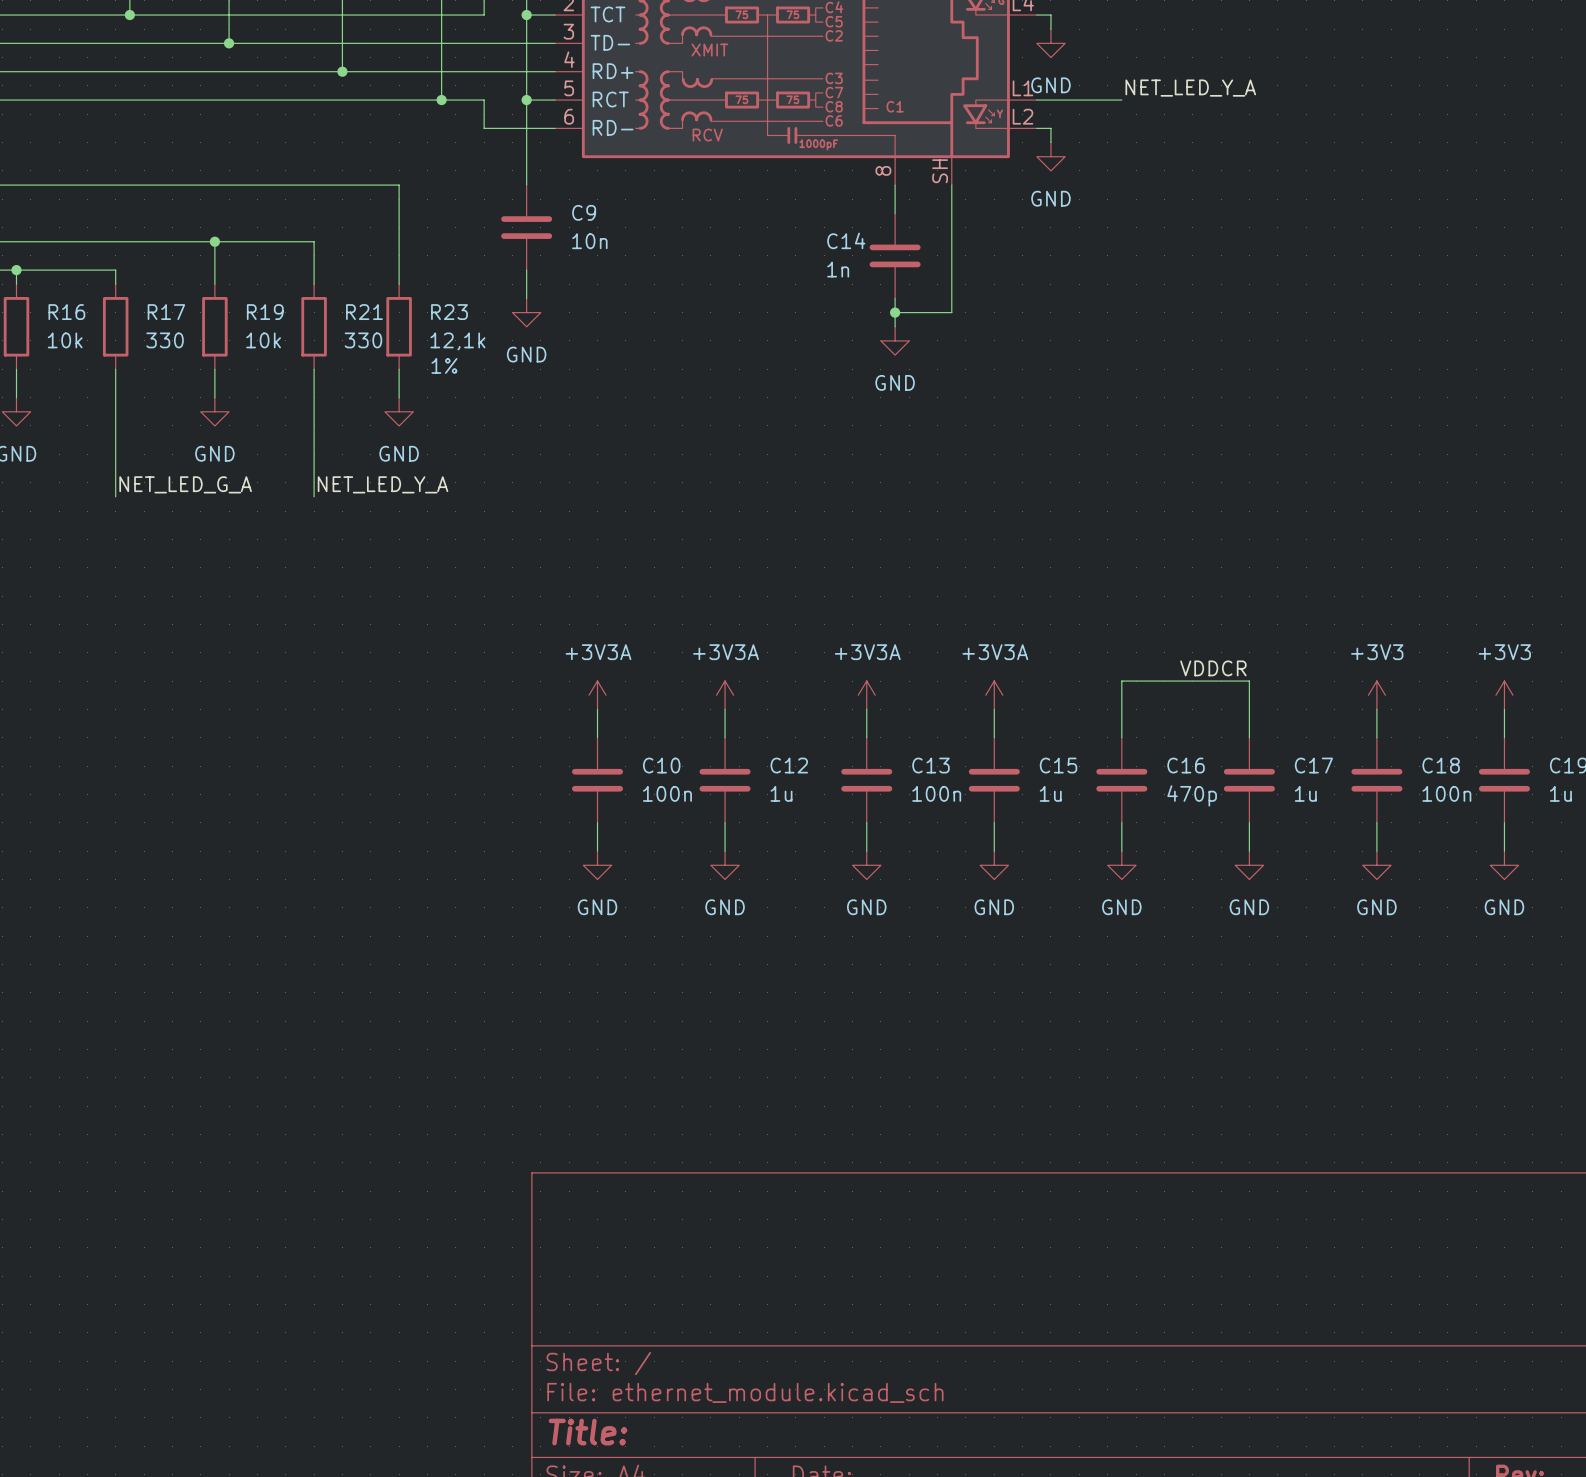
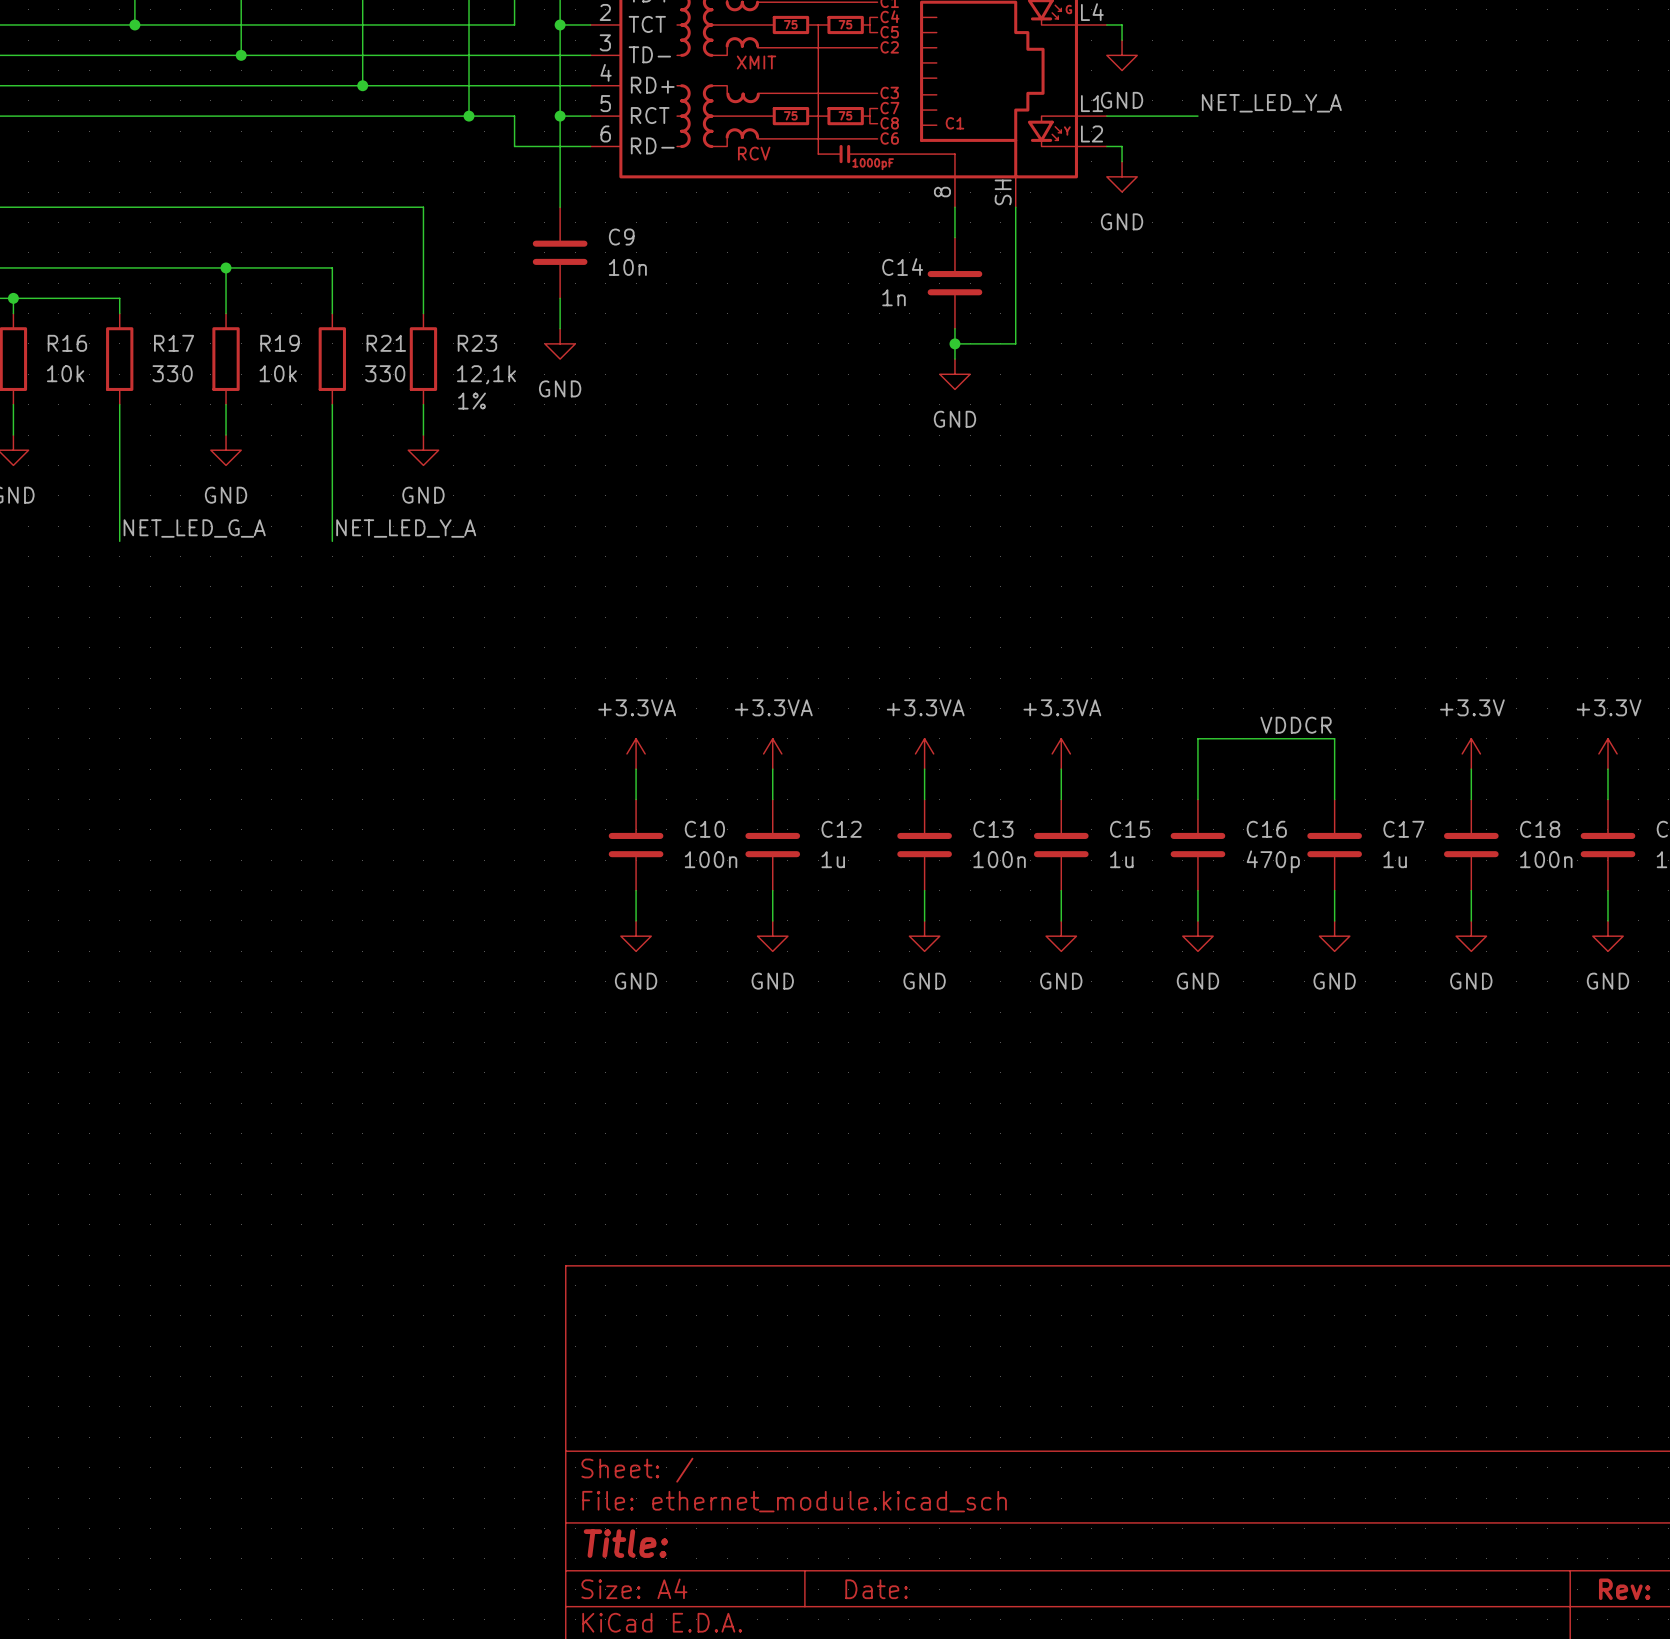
power symbol: +3V3A (597, 695) -> +3.3VA (636, 753)
power symbol: +3V3A (725, 695) -> +3.3VA (772, 753)
power symbol: +3V3A (866, 695) -> +3.3VA (924, 753)
power symbol: +3V3A (994, 695) -> +3.3VA (1061, 753)
power symbol: +3V3 (1376, 695) -> +3.3V (1471, 753)
power symbol: +3V3 (1504, 695) -> +3.3V (1607, 753)

